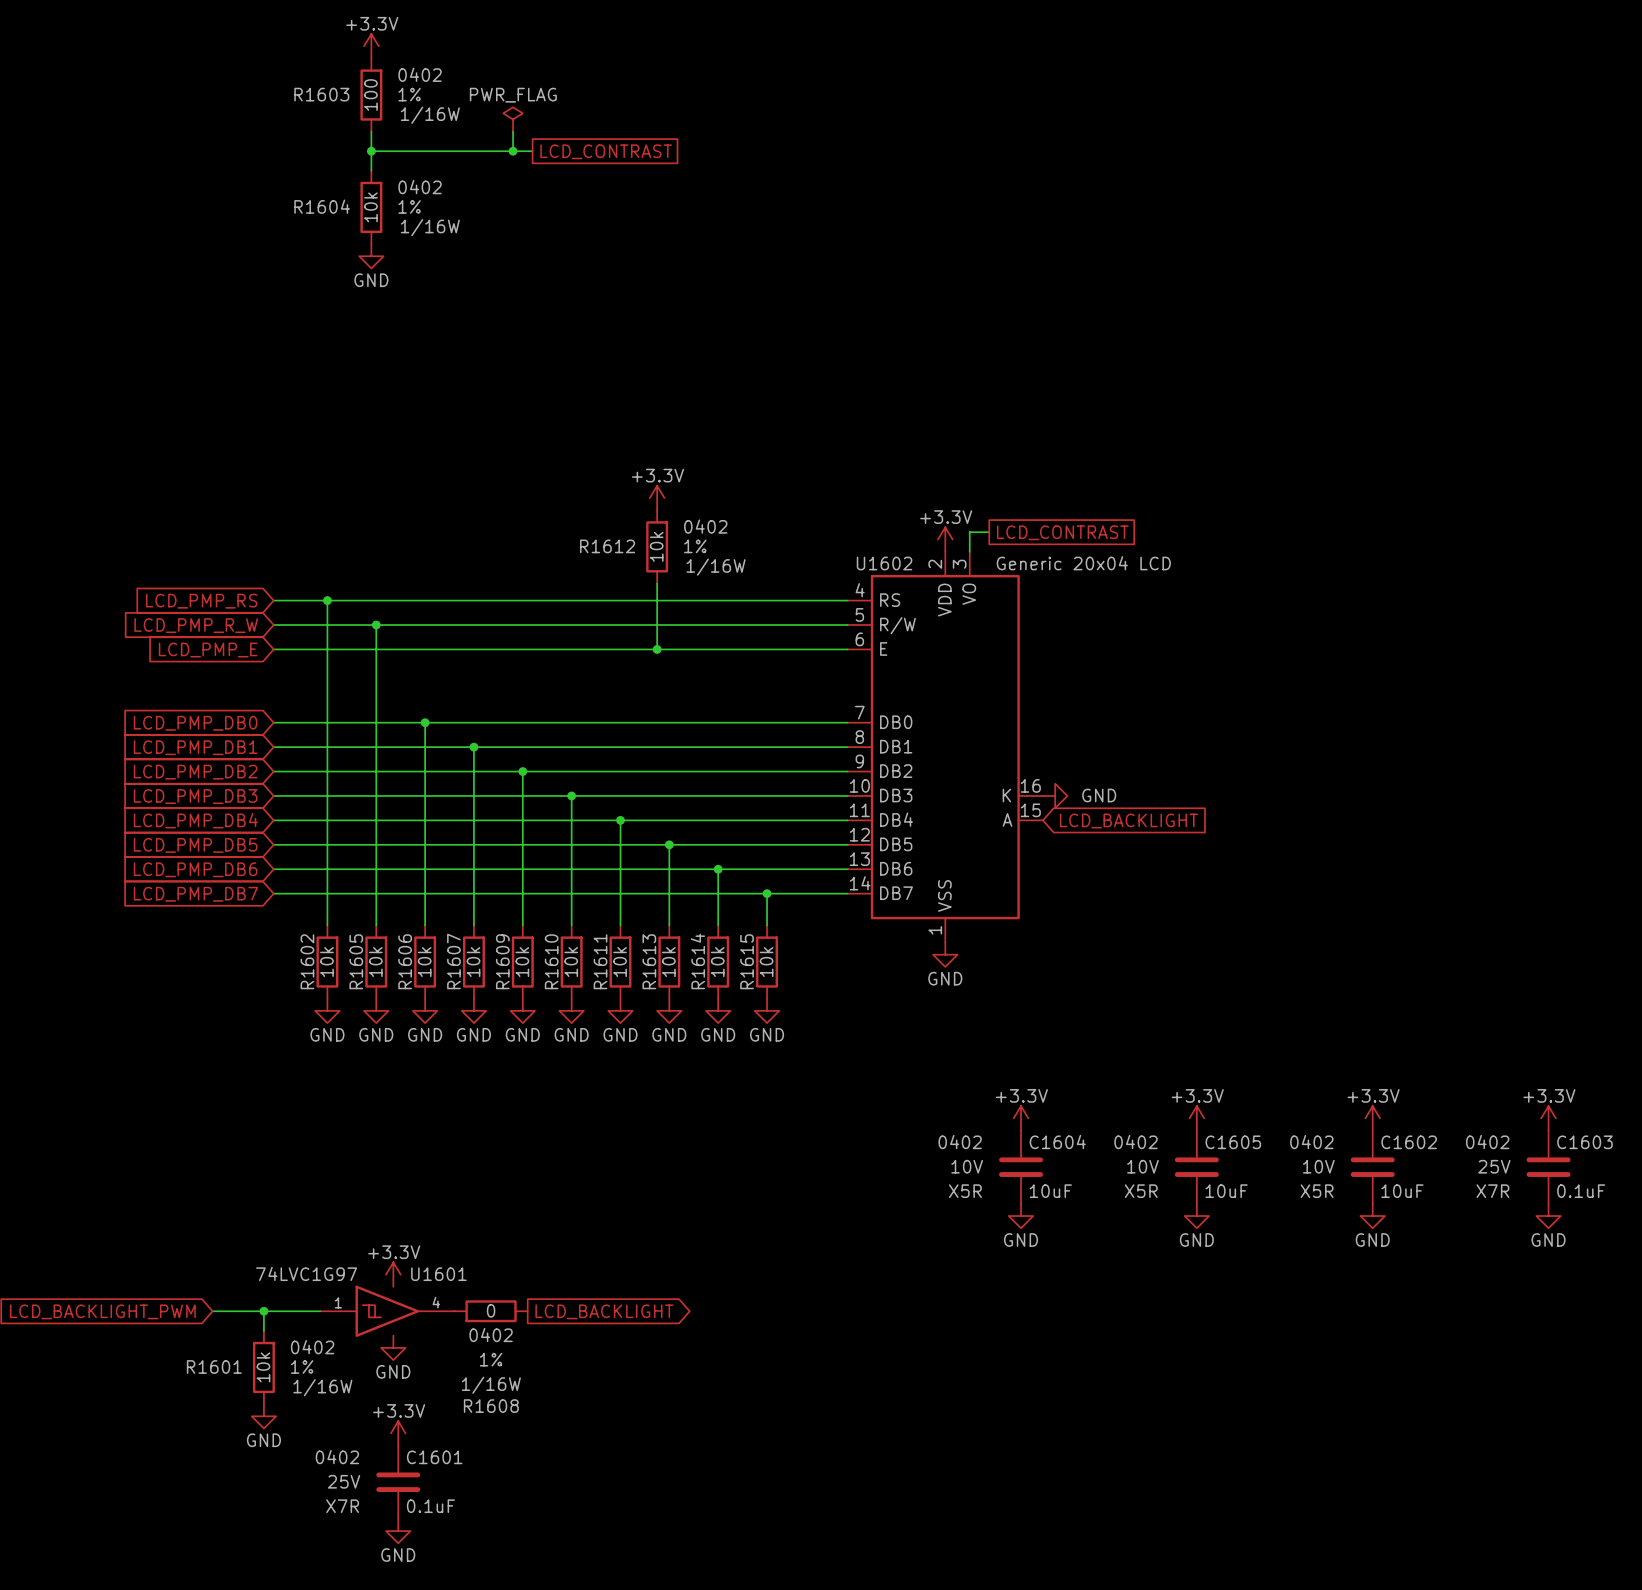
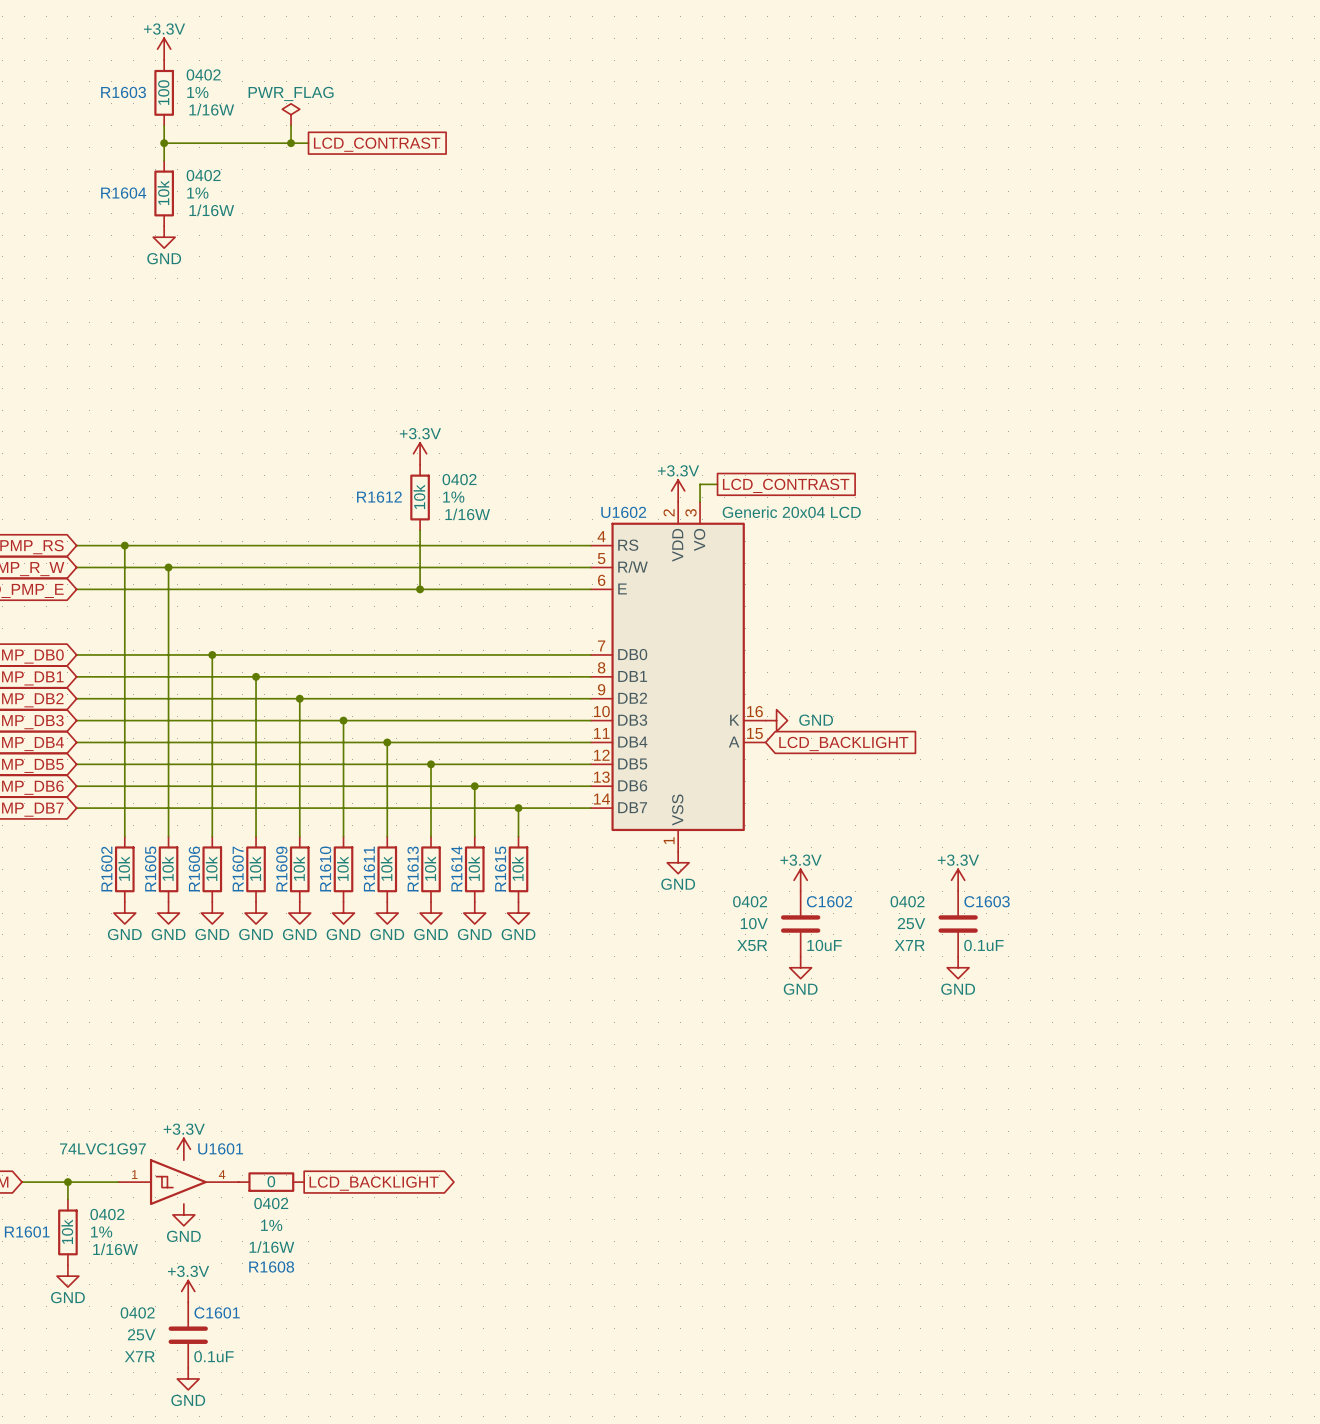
power symbol: none -> +3.3V (800, 880)
power symbol: none -> +3.3V (958, 880)
power symbol: none -> GND (800, 967)
power symbol: none -> GND (958, 967)
power symbol: +3.3V (1021, 1118) -> none
power symbol: +3.3V (1196, 1118) -> none
power symbol: +3.3V (1372, 1118) -> none
power symbol: +3.3V (1548, 1118) -> none
C1604: 10uF (1021, 1167) -> none
C1605: 10uF (1196, 1167) -> none
C1602 position: (1372, 1167) -> (800, 924)
C1603 position: (1548, 1167) -> (958, 924)
power symbol: GND (1021, 1216) -> none
power symbol: GND (1196, 1216) -> none
power symbol: GND (1372, 1216) -> none
power symbol: GND (1548, 1216) -> none

